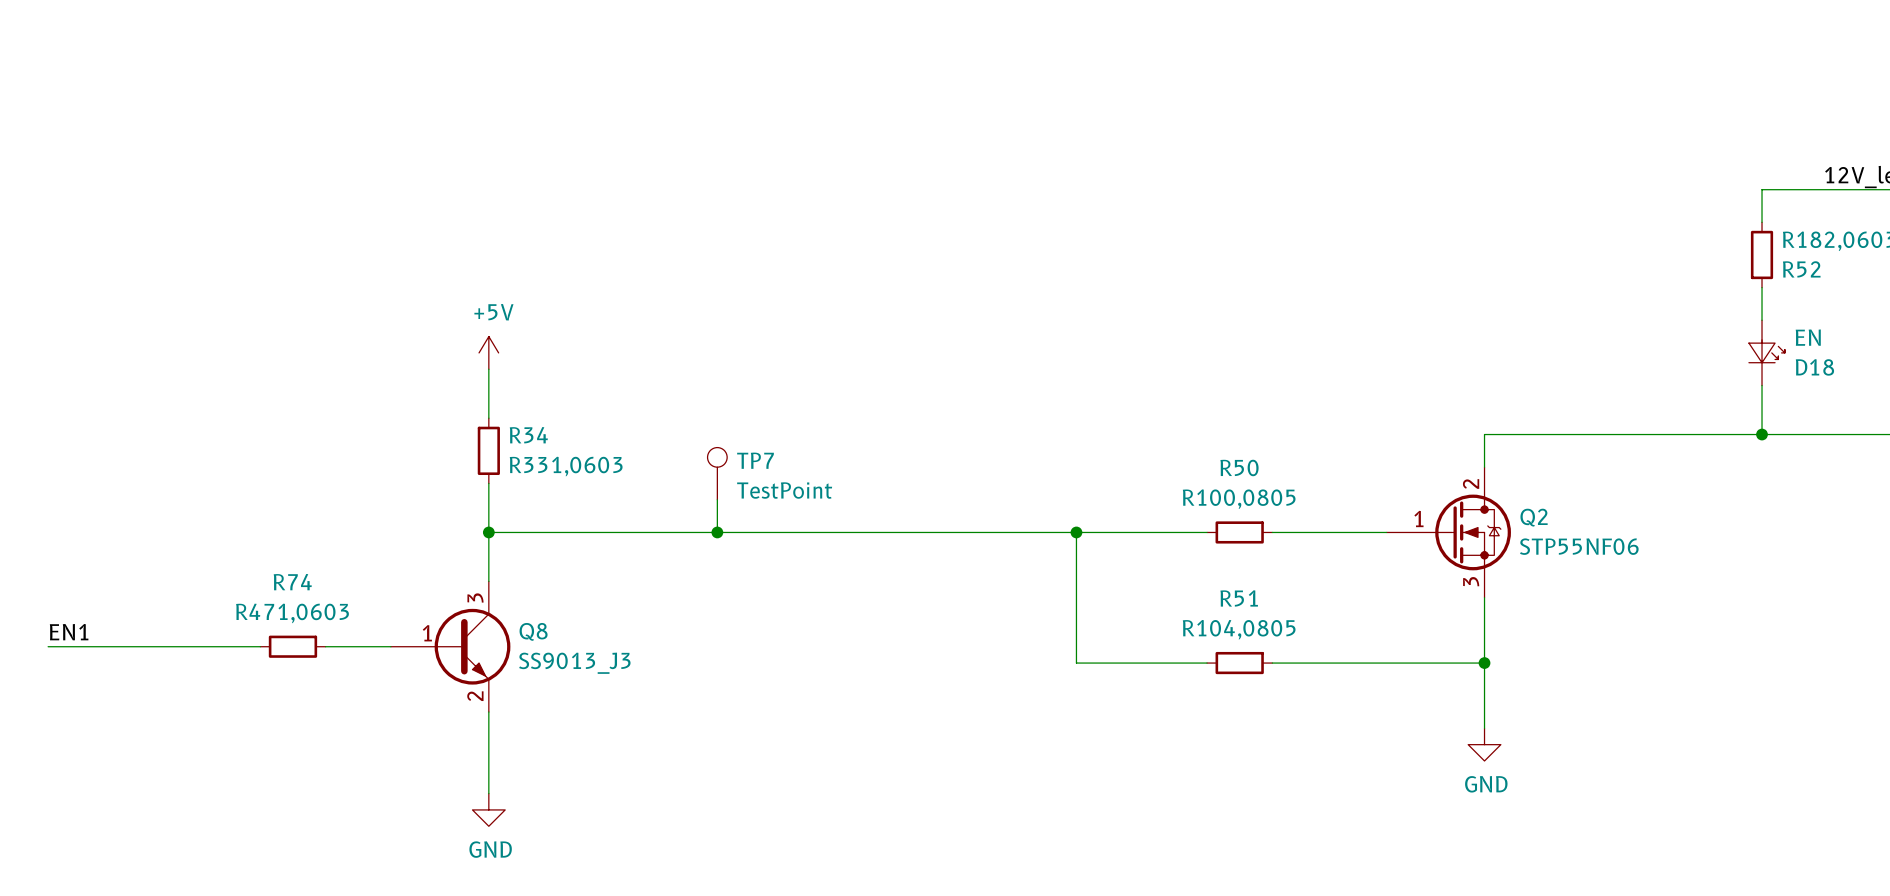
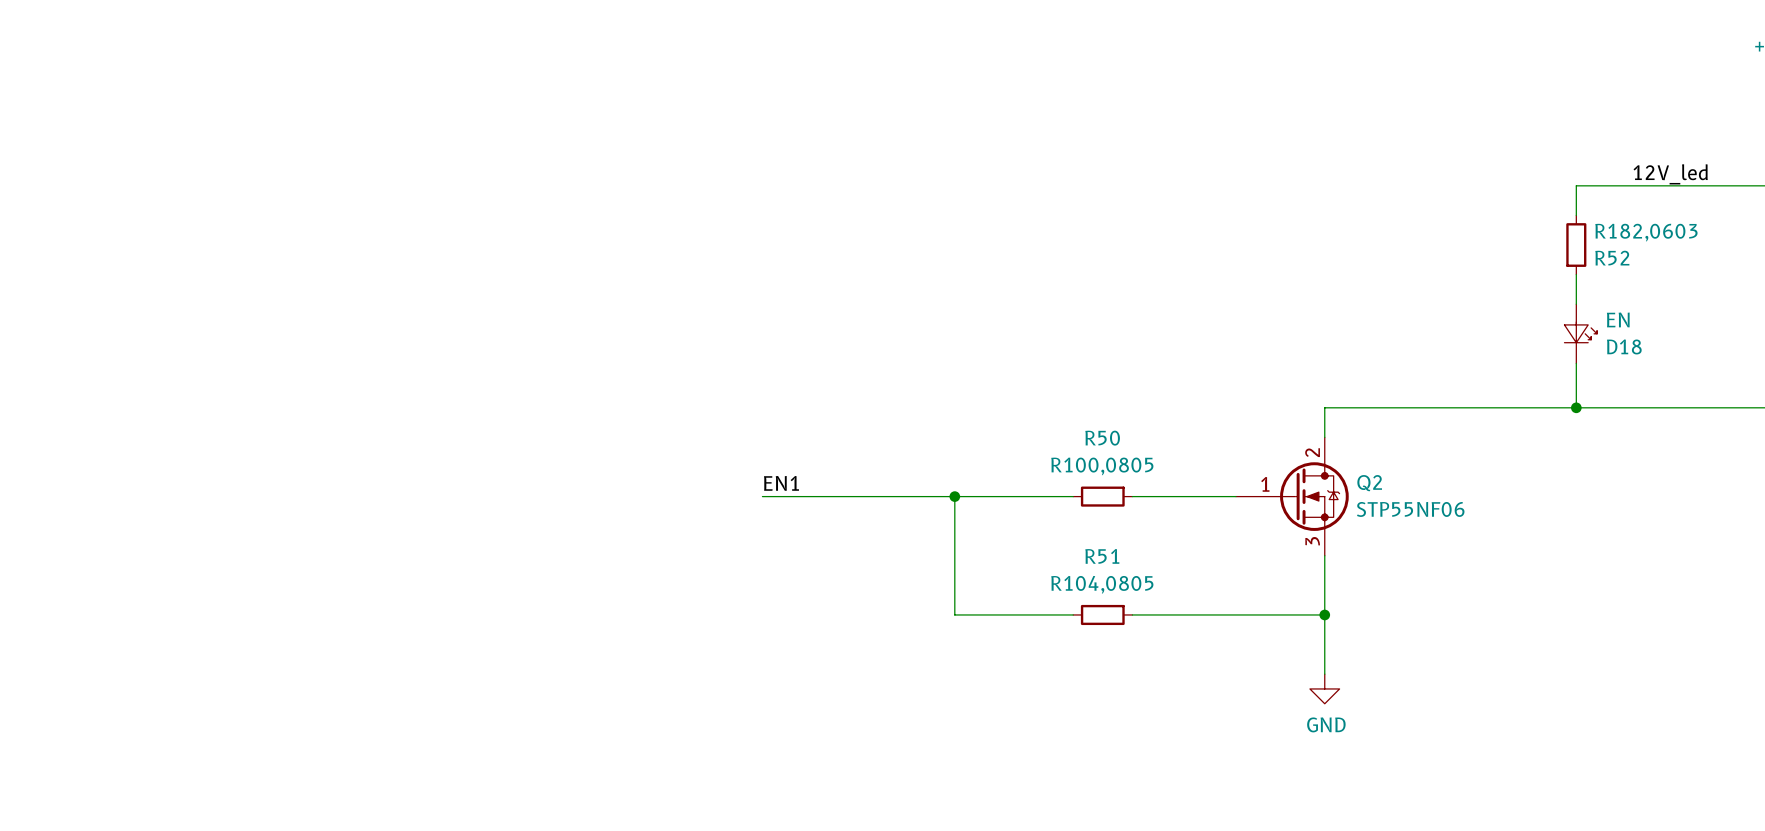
power symbol: +5V (488, 352) -> none
wire: (488, 369) (488, 418) -> none
R34: R331,0603 (488, 450) -> none
TP7: TestPoint (717, 473) -> none
wire: (488, 483) (488, 581) -> none
wire: (717, 499) (717, 532) -> none
label: none -> EN1 (781, 483)
wire: (488, 532) (864, 532) -> none
junction: (488, 532) -> none
junction: (717, 532) -> none
label: EN1 (69, 632) -> none
wire: (48, 646) (260, 646) -> none
R74: R471,0603 (292, 646) -> none
wire: (325, 646) (390, 646) -> none
Q8: SS9013_J3 (450, 646) -> none
wire: (488, 712) (488, 793) -> none
power symbol: GND (488, 809) -> none

